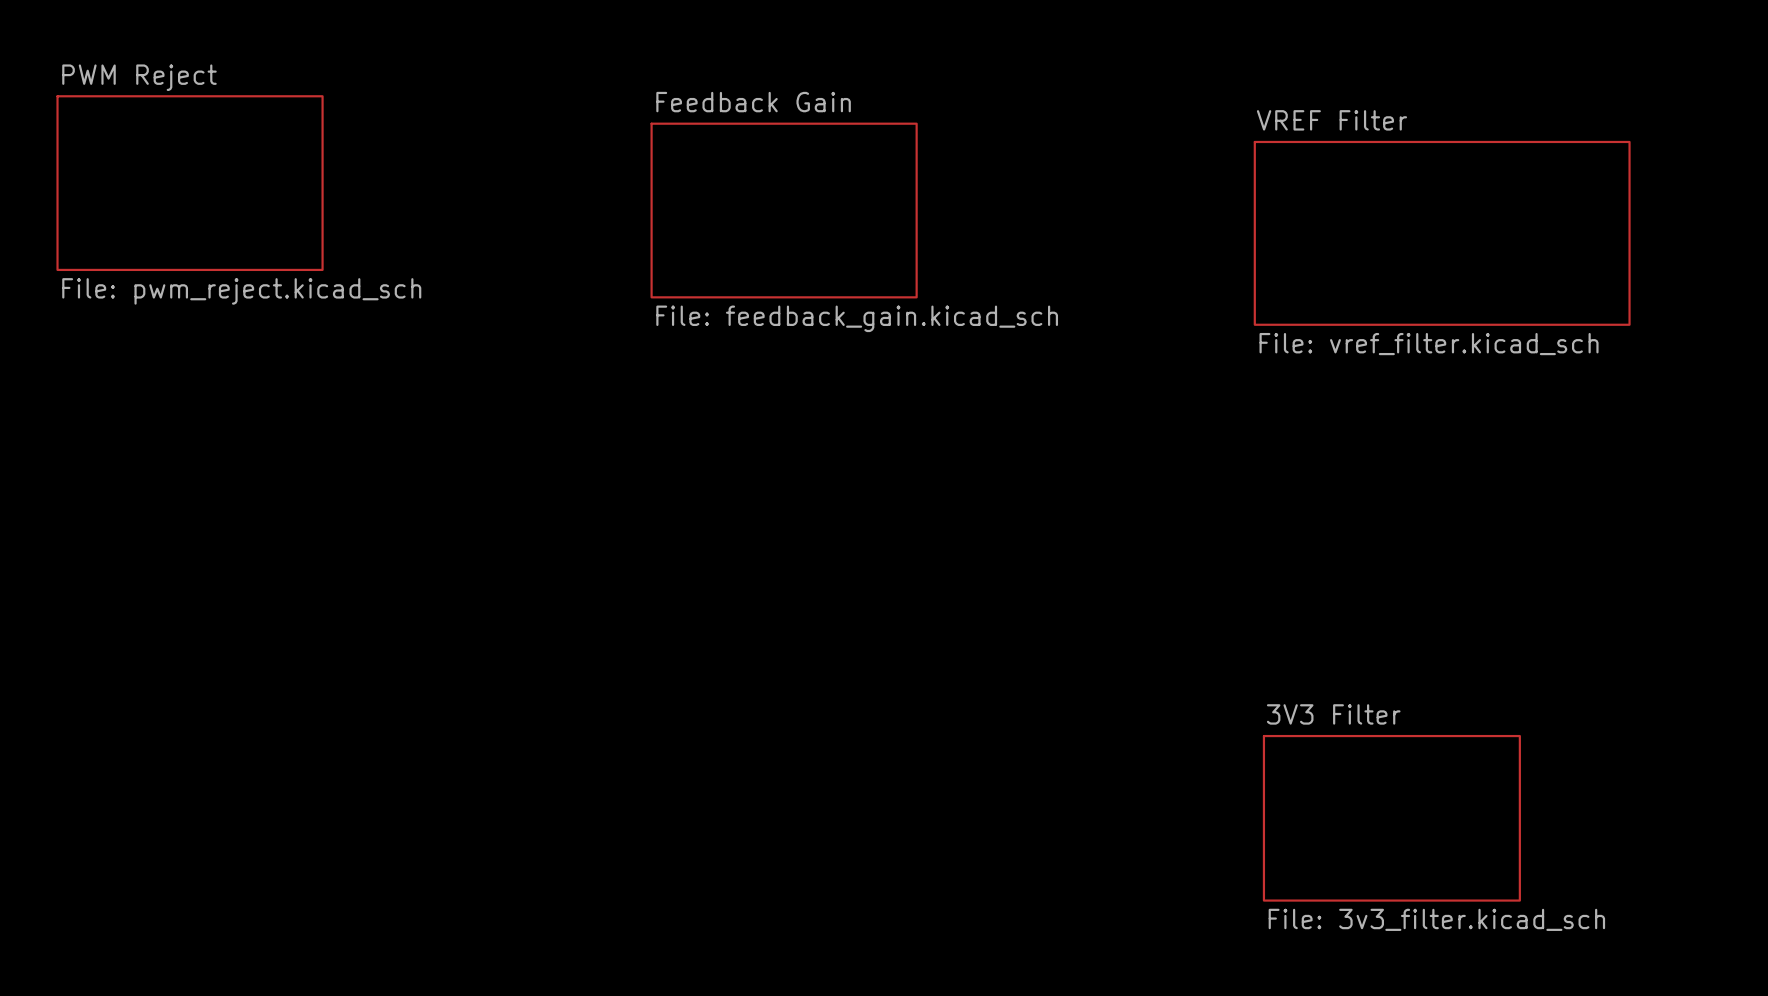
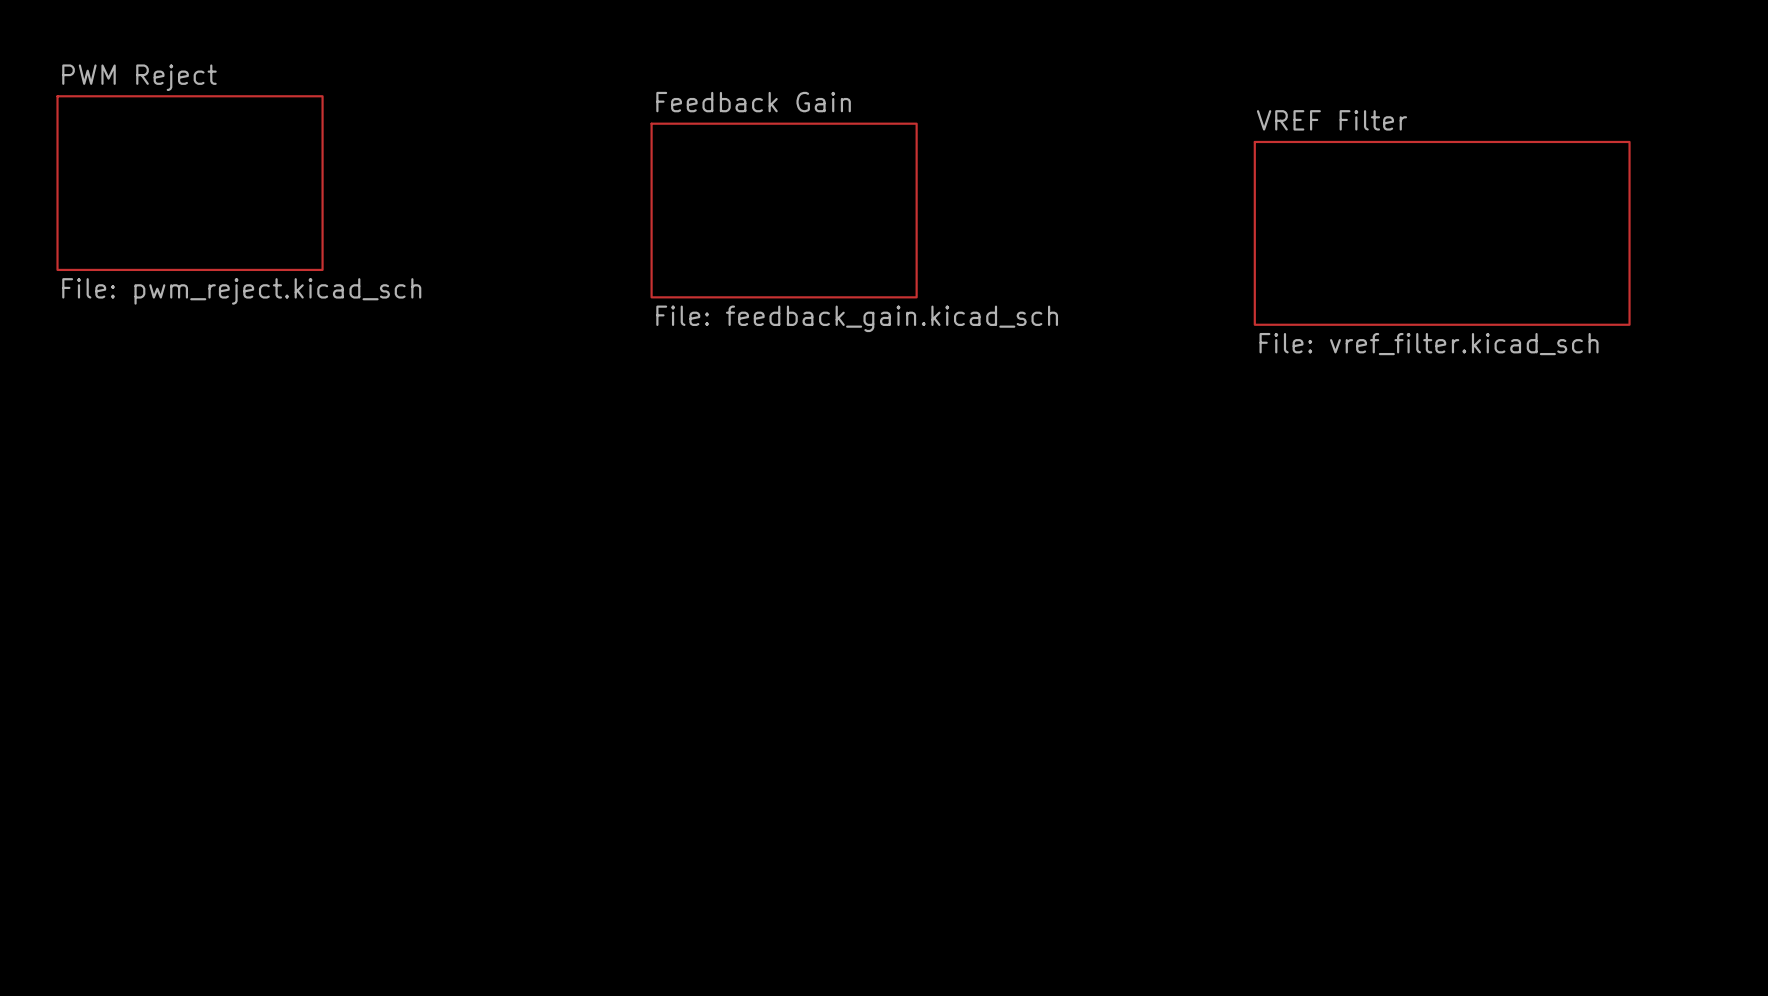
sheet 3V3 Filter: File: 3v3_filter.kicad_sch (1391, 818) -> none

